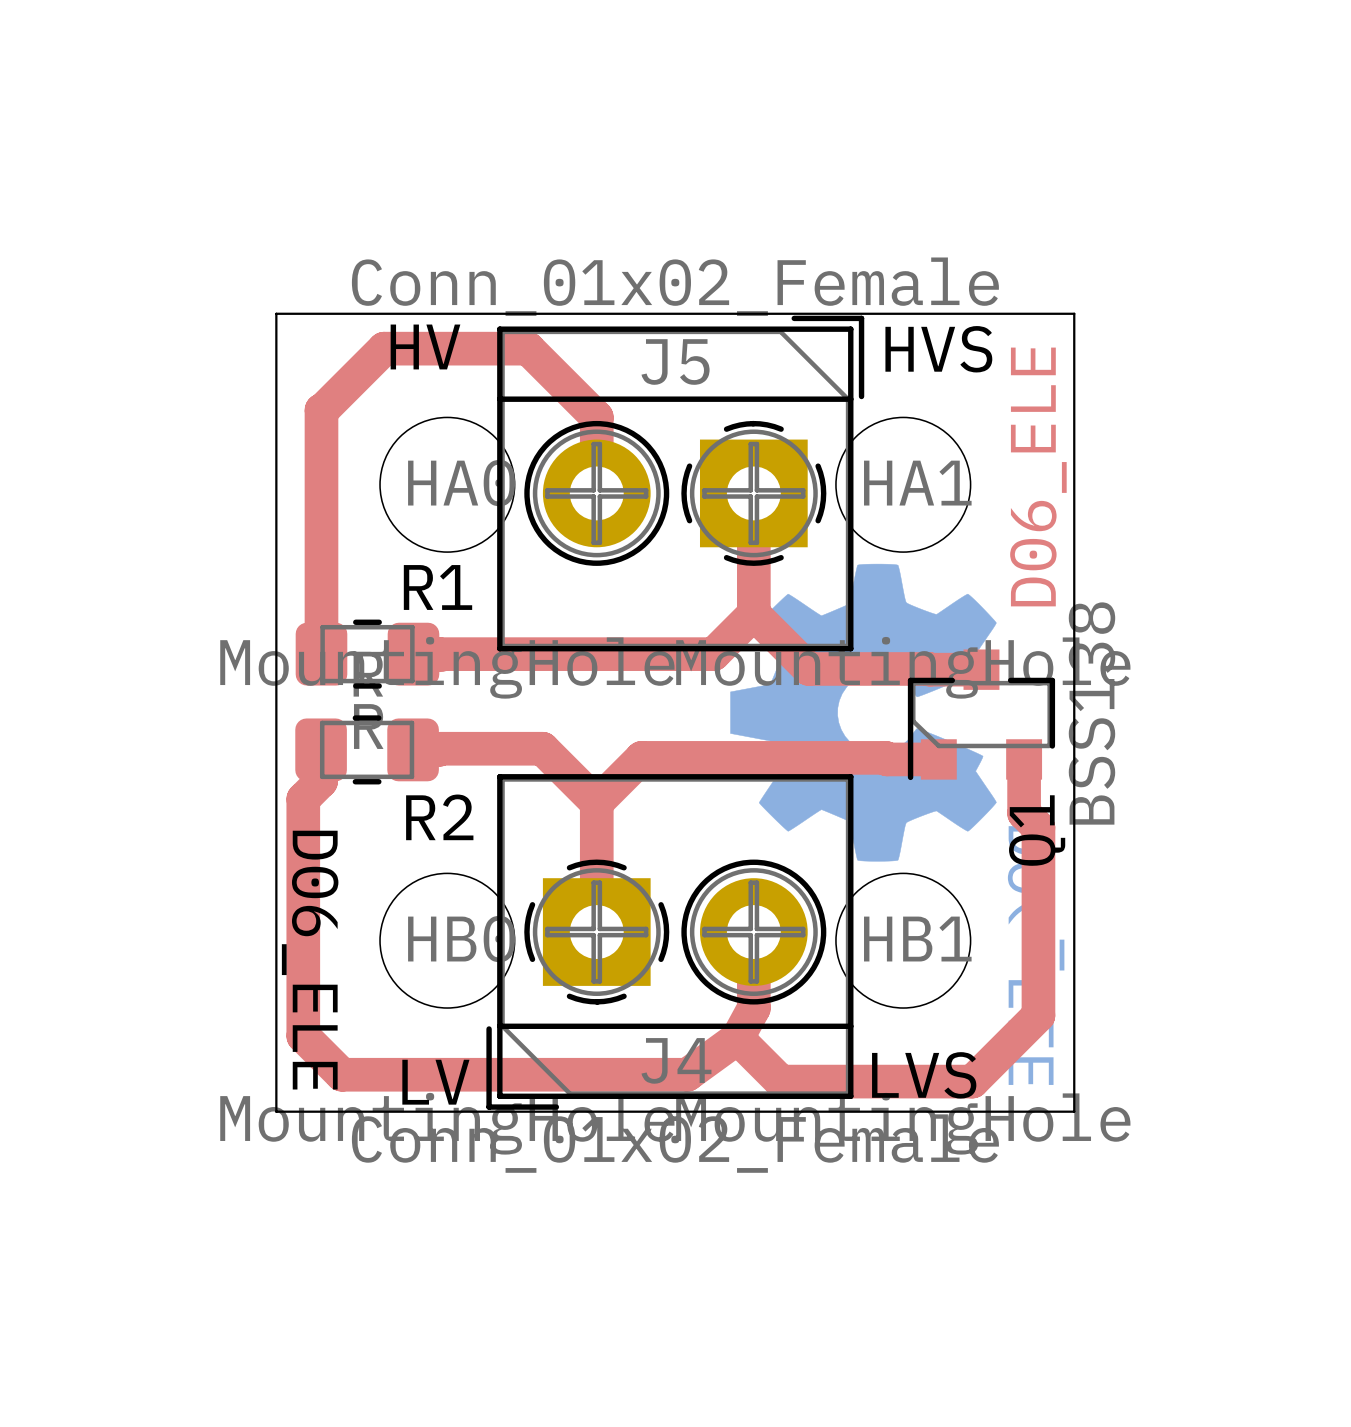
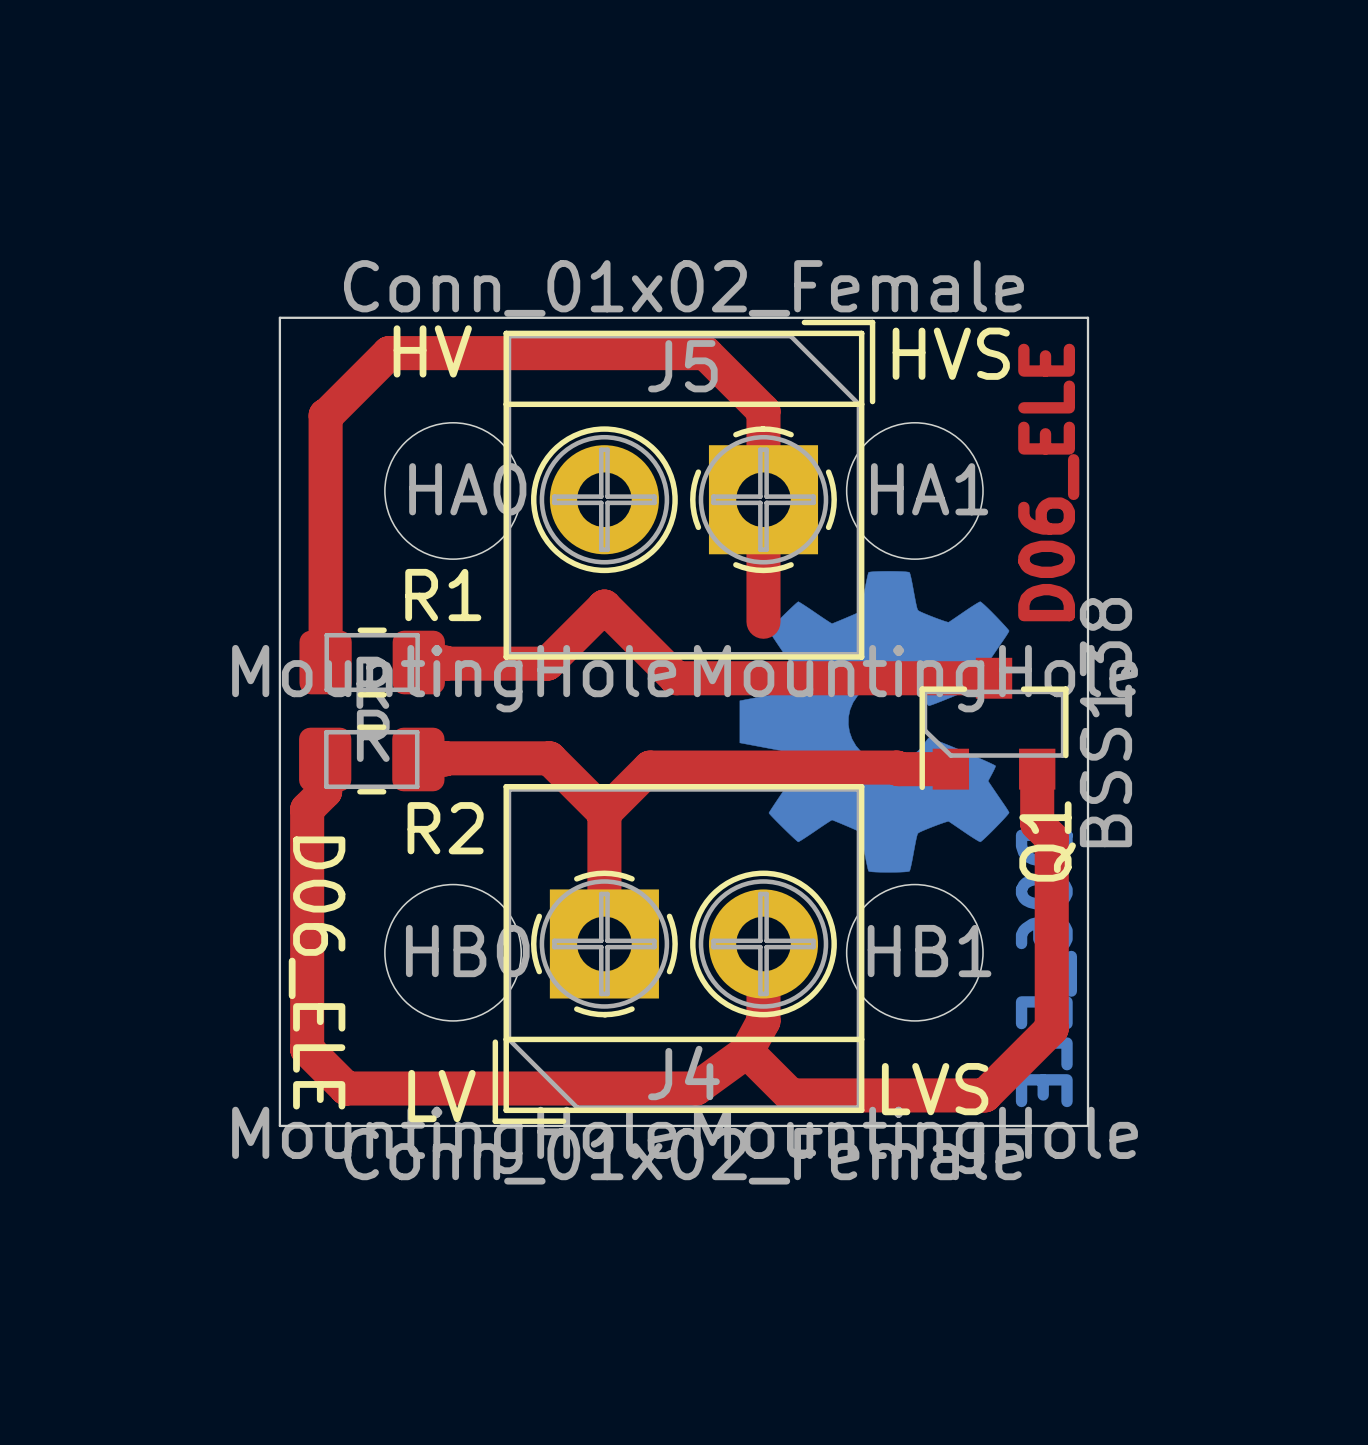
top track: (528, 348) (596, 417) (596, 493) -> (534, 353) (705, 353) (763, 411) (763, 499)
top track: (439, 654) (713, 654) (753, 613) (808, 668) (929, 669) -> (446, 663) (547, 663) (604, 606) (676, 678) (941, 678)

